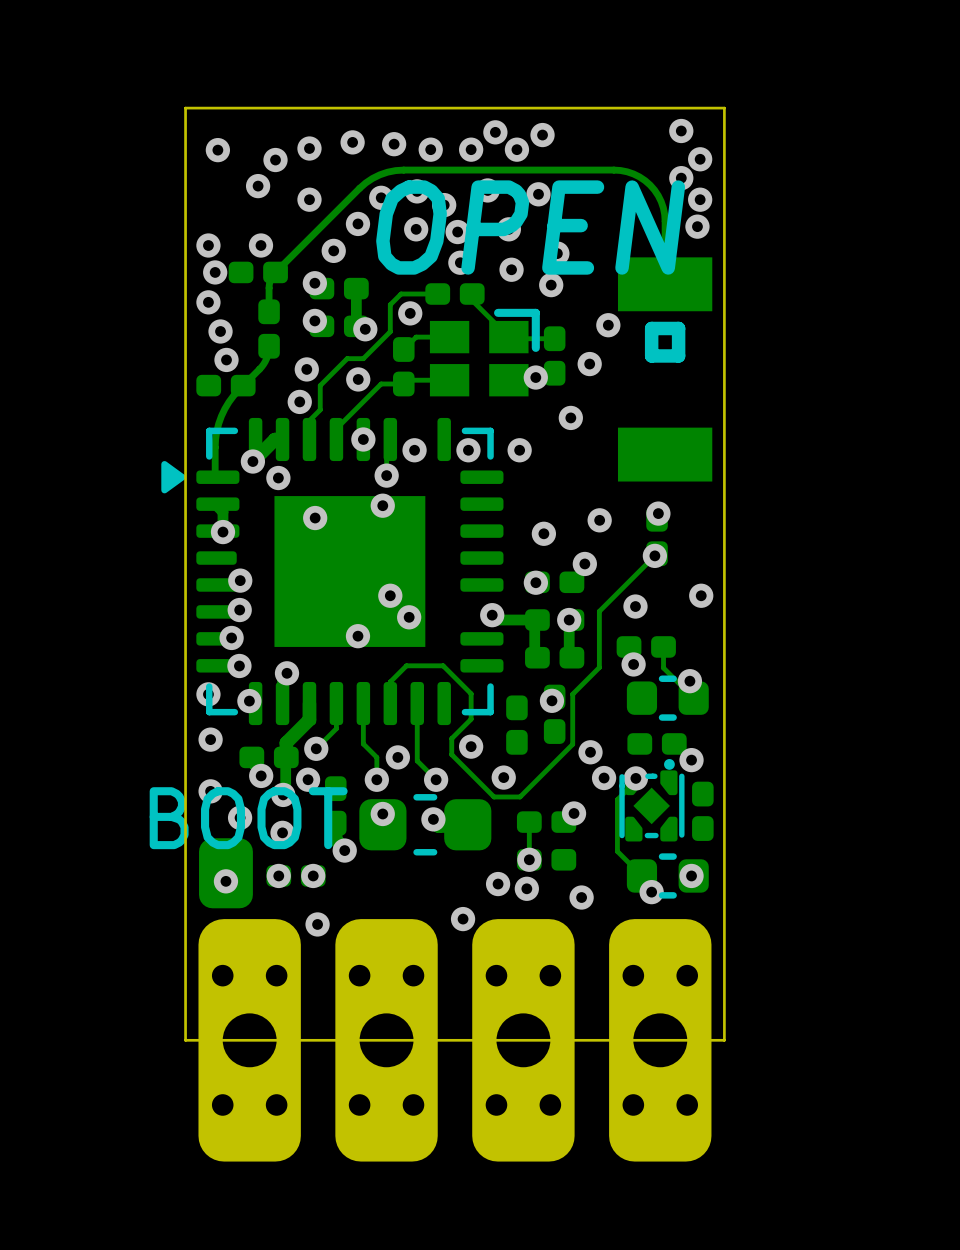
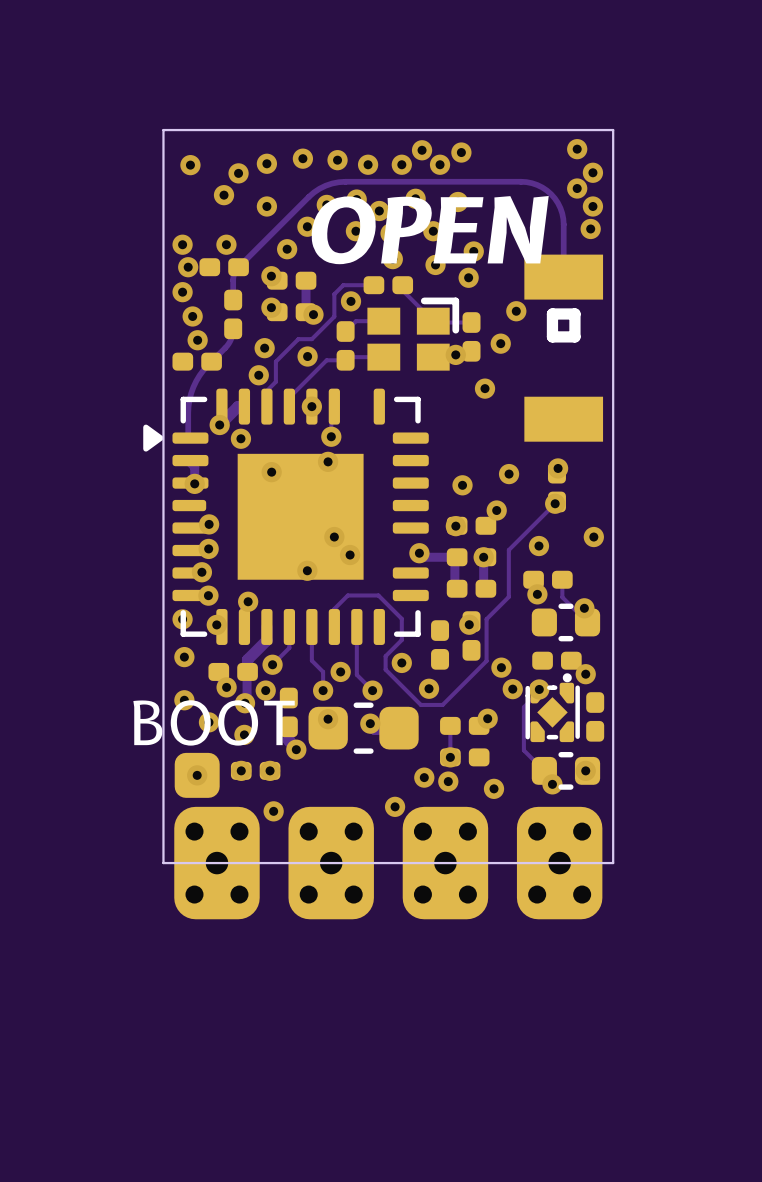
via: (414, 450) -> none
via: (468, 450) -> none
via: (519, 450) -> none
part footprint: [199, 838, 253, 909] -> [174, 752, 220, 798]
part footprint: [198, 919, 301, 1162] -> [174, 806, 260, 920]
part footprint: [335, 919, 438, 1162] -> [288, 806, 374, 920]
part footprint: [472, 919, 575, 1162] -> [402, 806, 489, 920]
part footprint: [609, 919, 712, 1162] -> [516, 806, 603, 920]
board edge: (724, 986) (724, 1040) (185, 1040) (185, 986) -> (613, 863) (163, 863)

